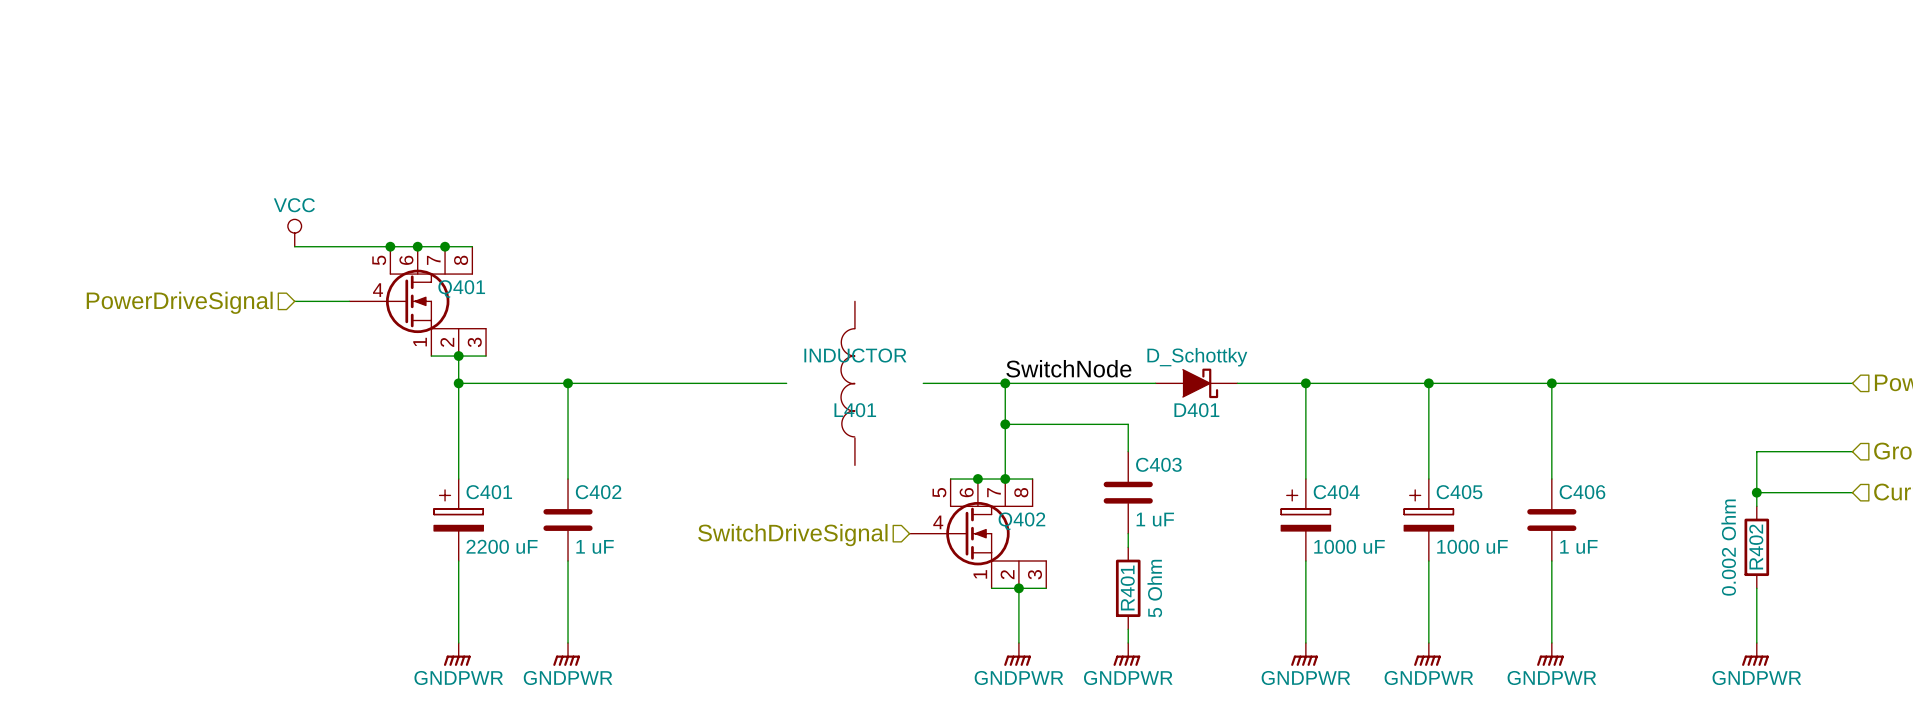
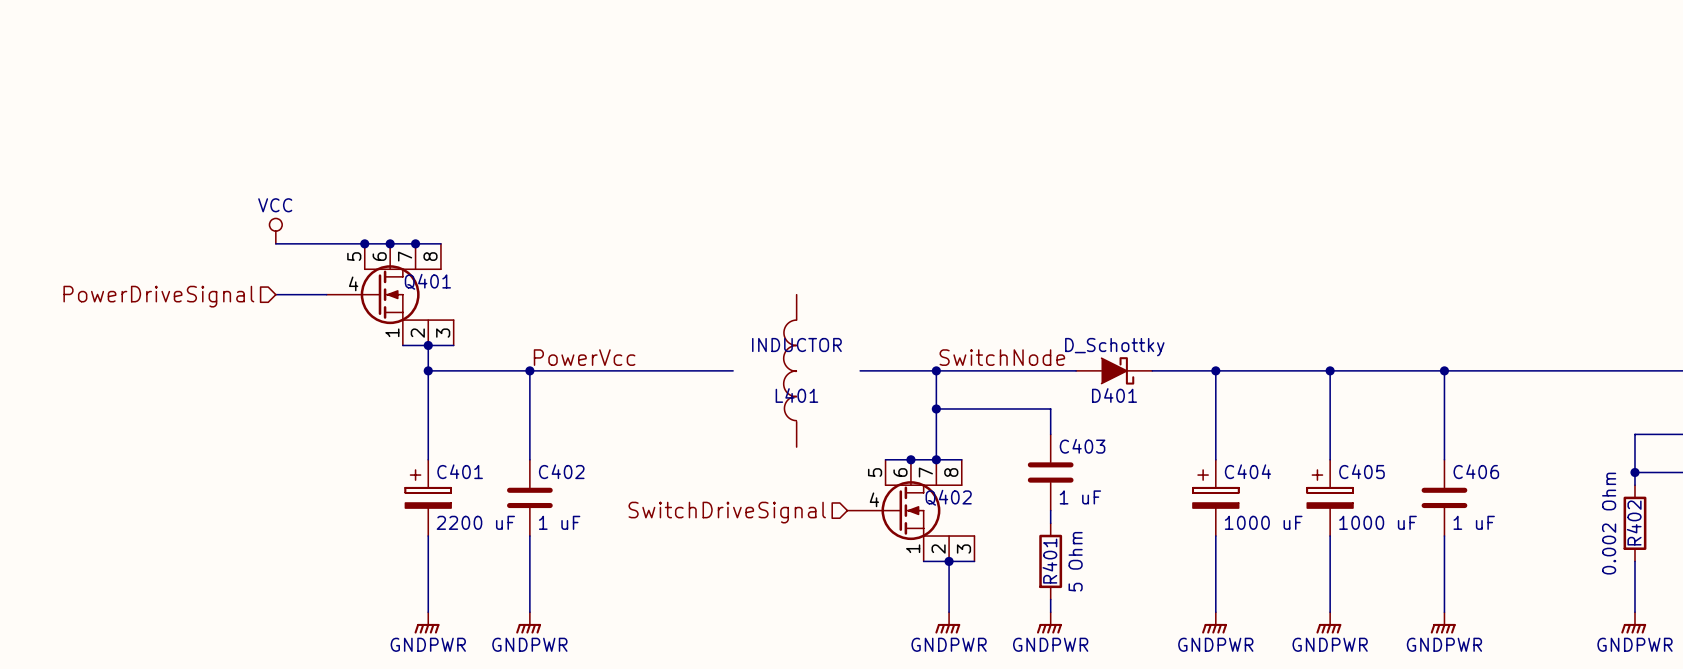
label: none -> PowerVcc (584, 357)

